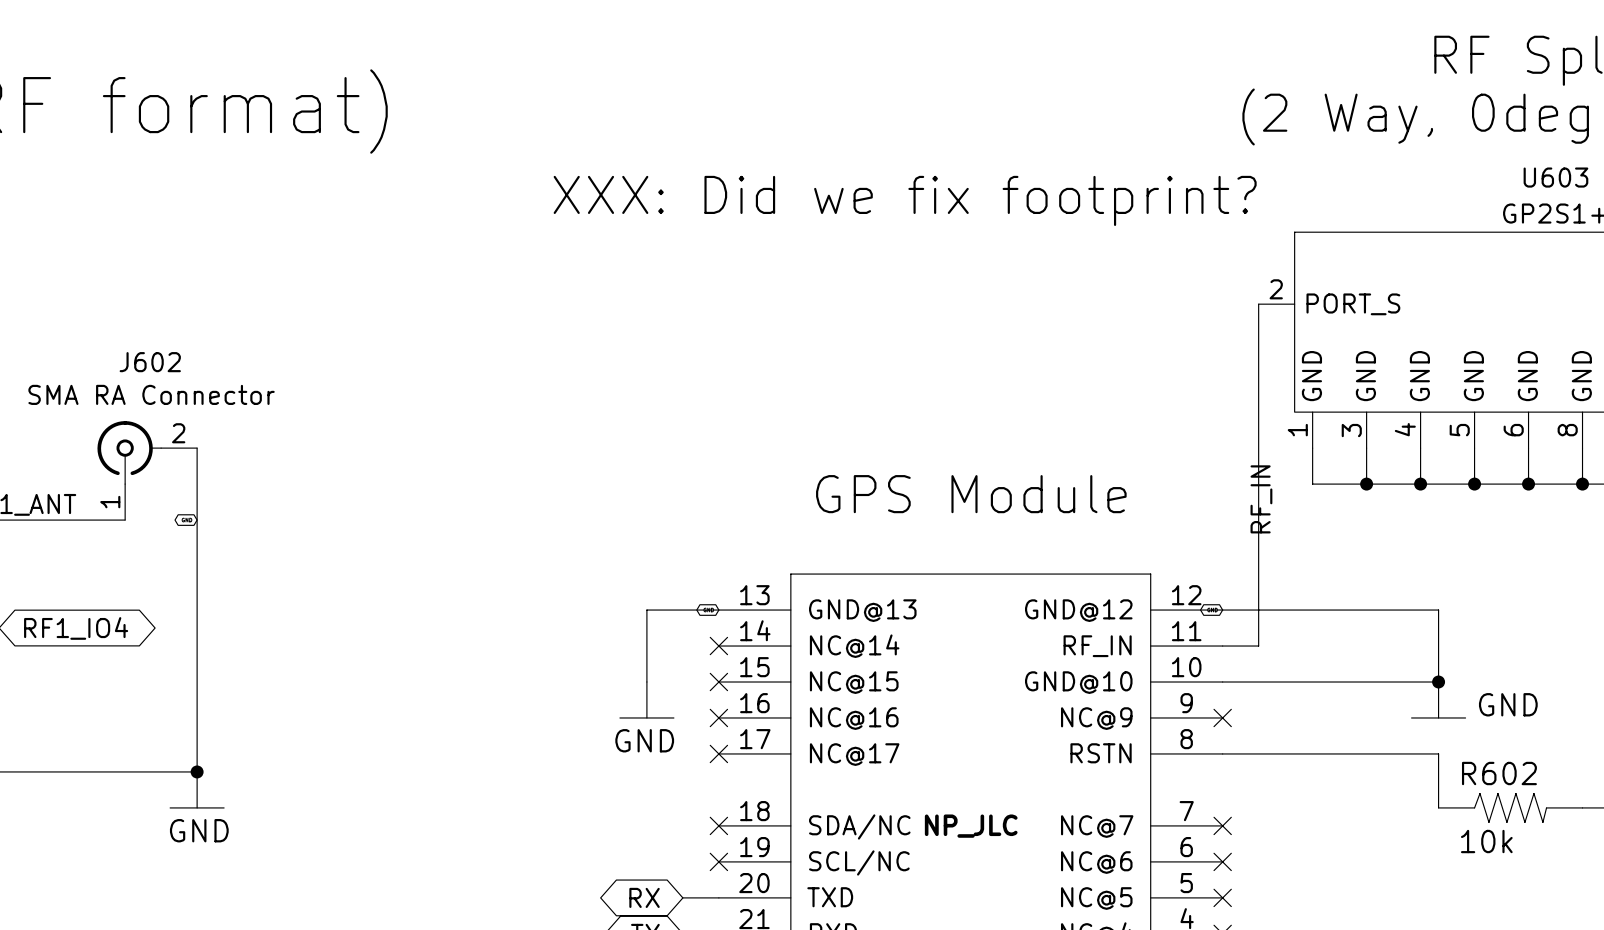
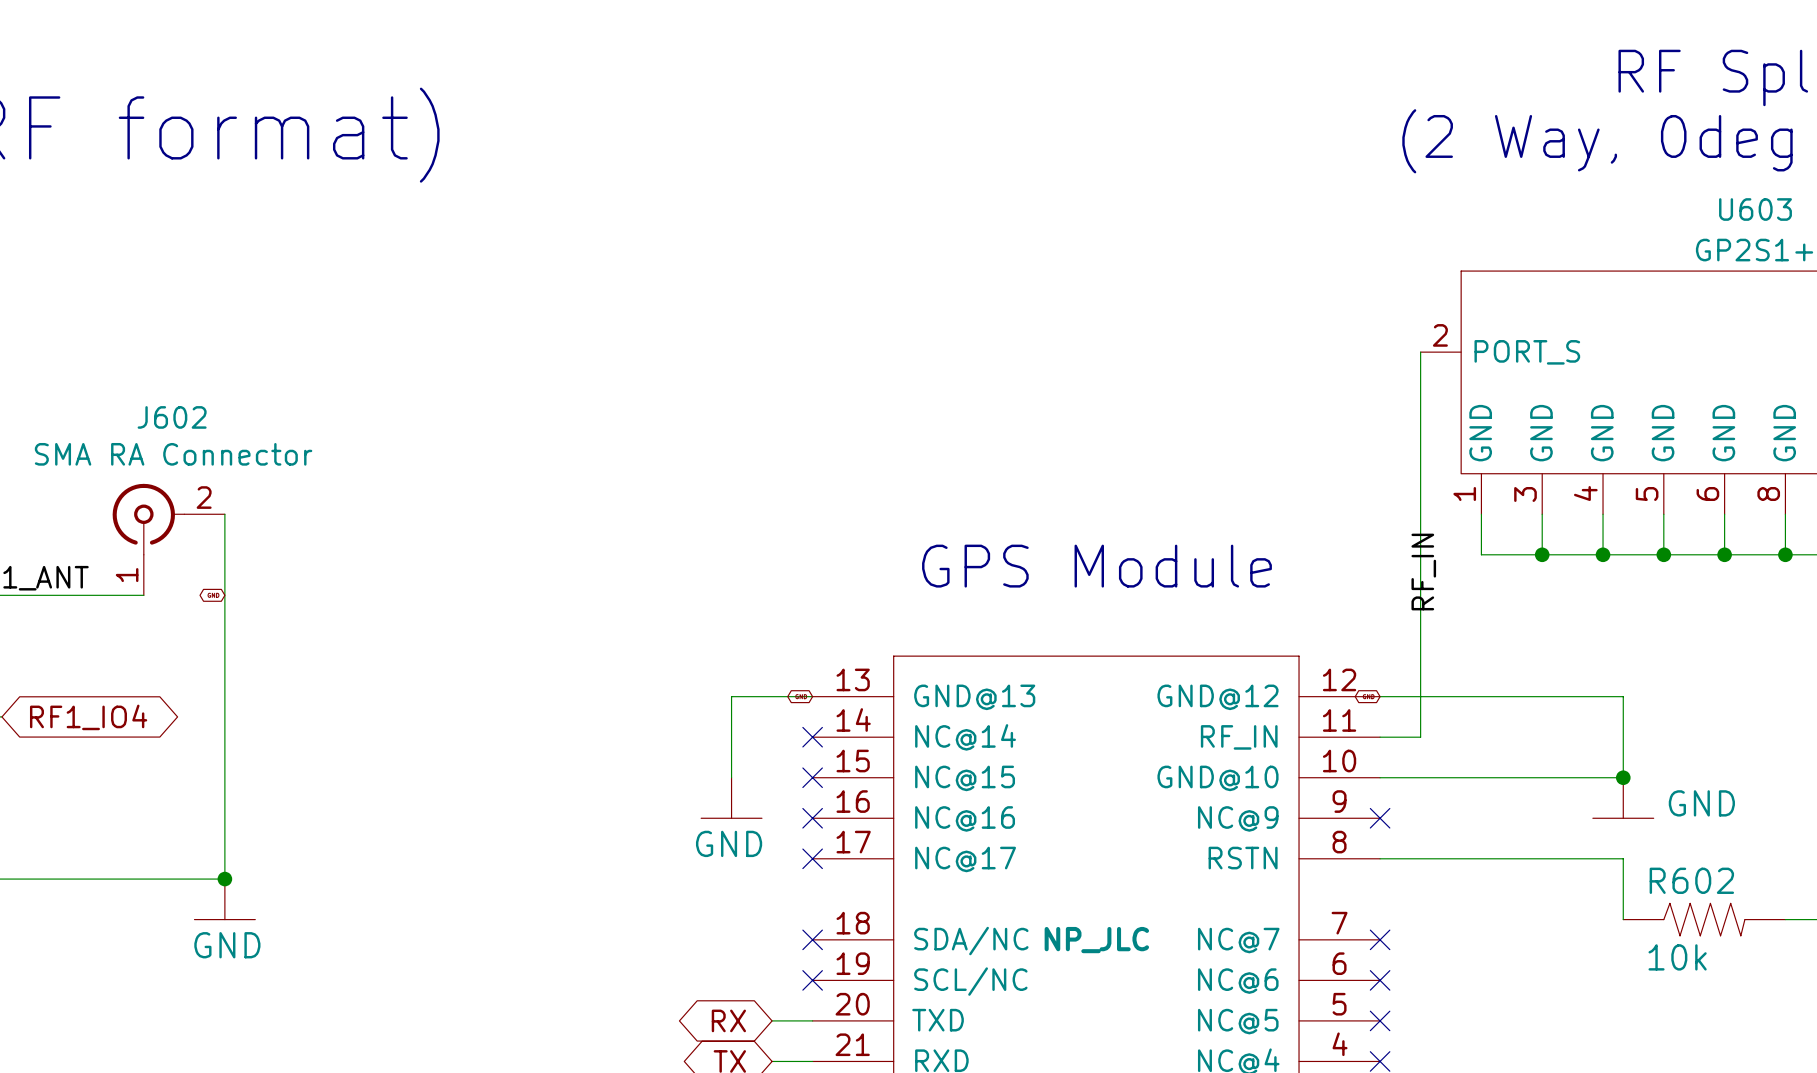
text: XXX: Did we fix footprint? (905, 200) -> none

